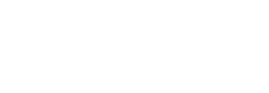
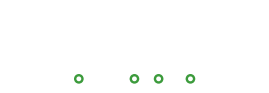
via: none -> (78, 78)
via: none -> (134, 78)
via: none -> (158, 78)
via: none -> (190, 78)

